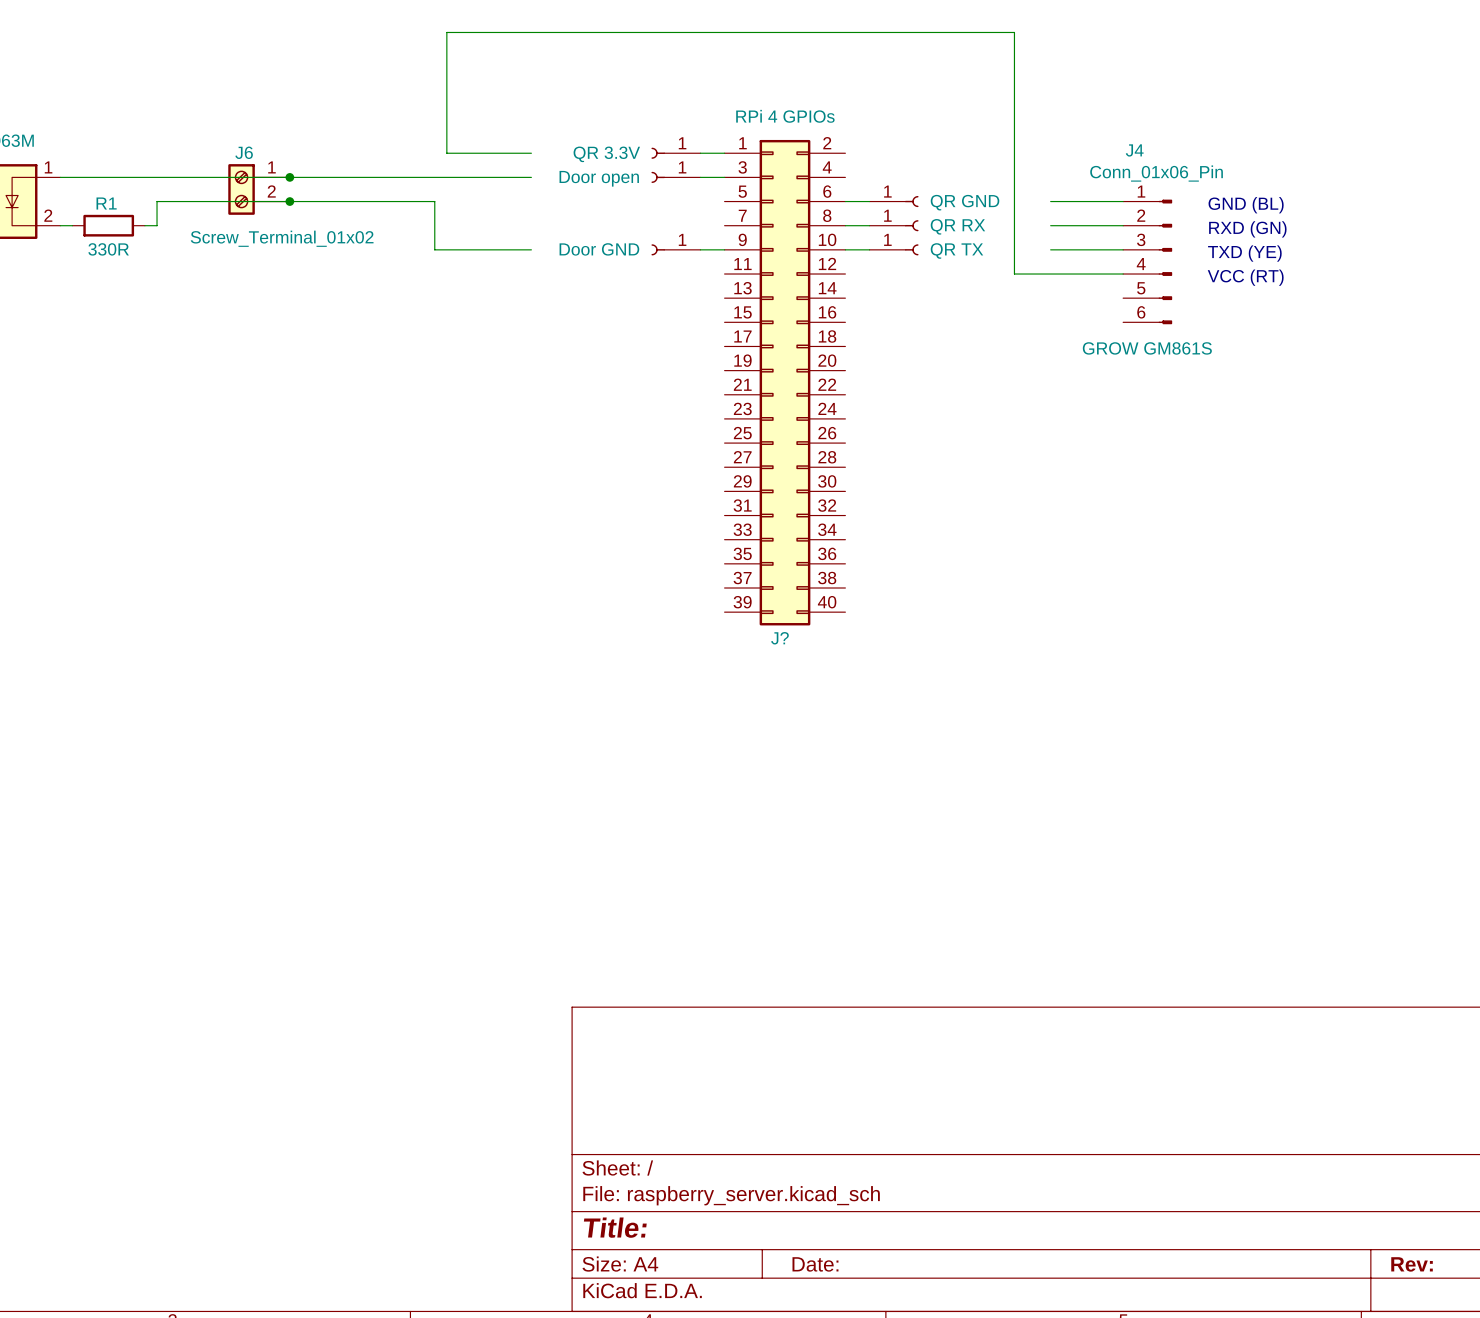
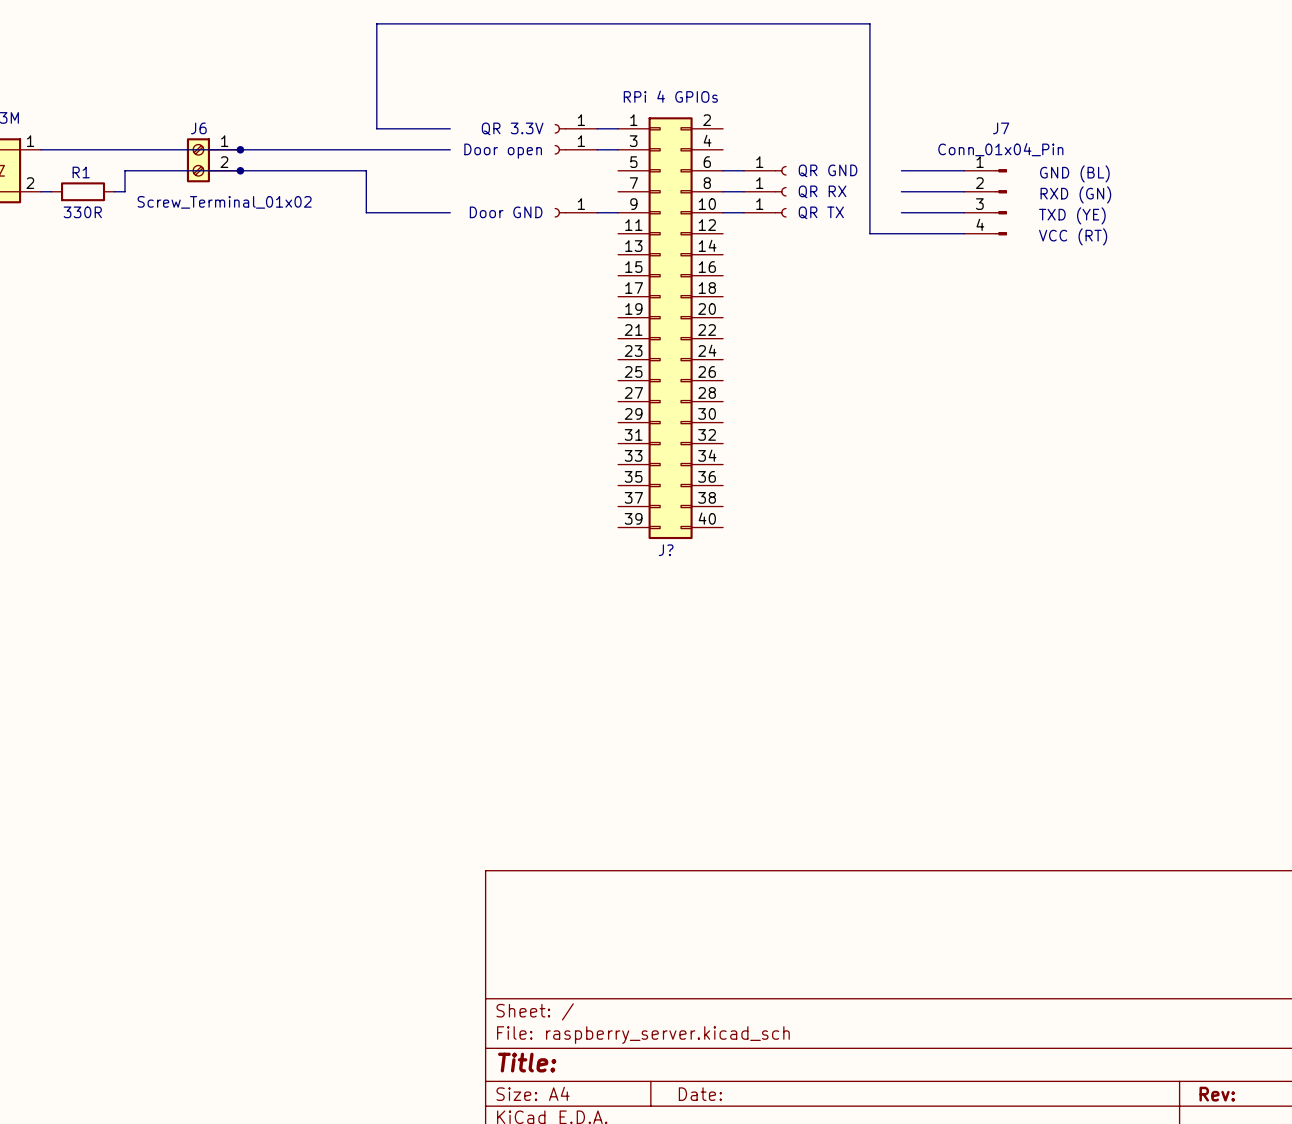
J7: none -> Conn_01x04_Pin (985, 202)
J4: Conn_01x06_Pin (1147, 261) -> none

